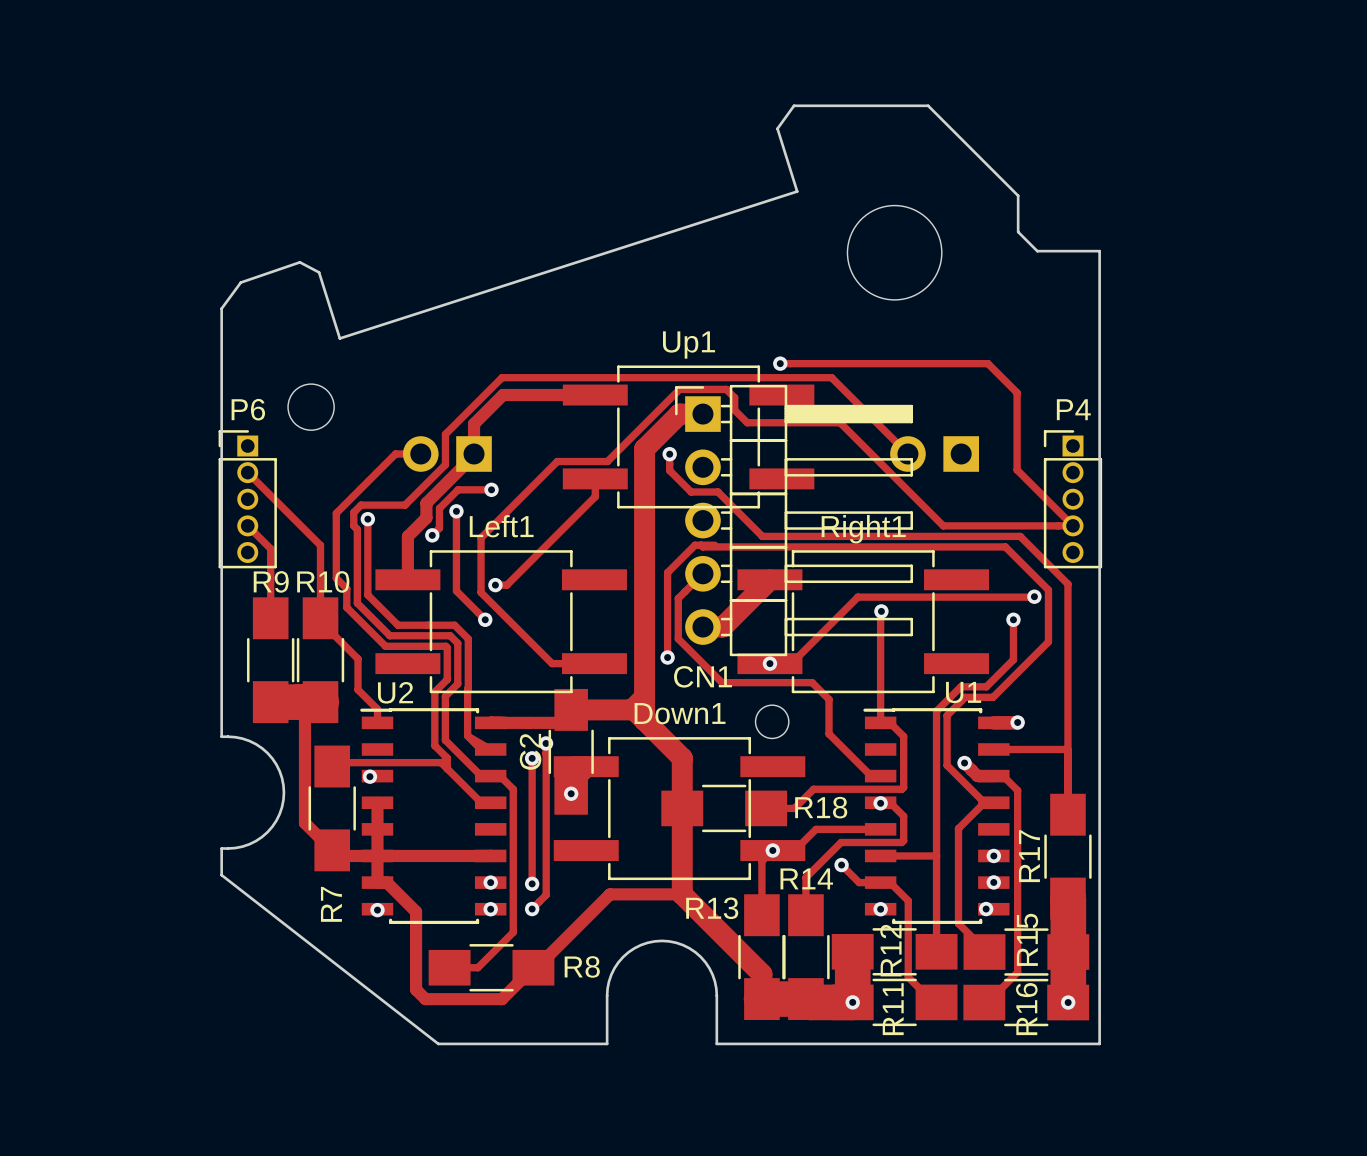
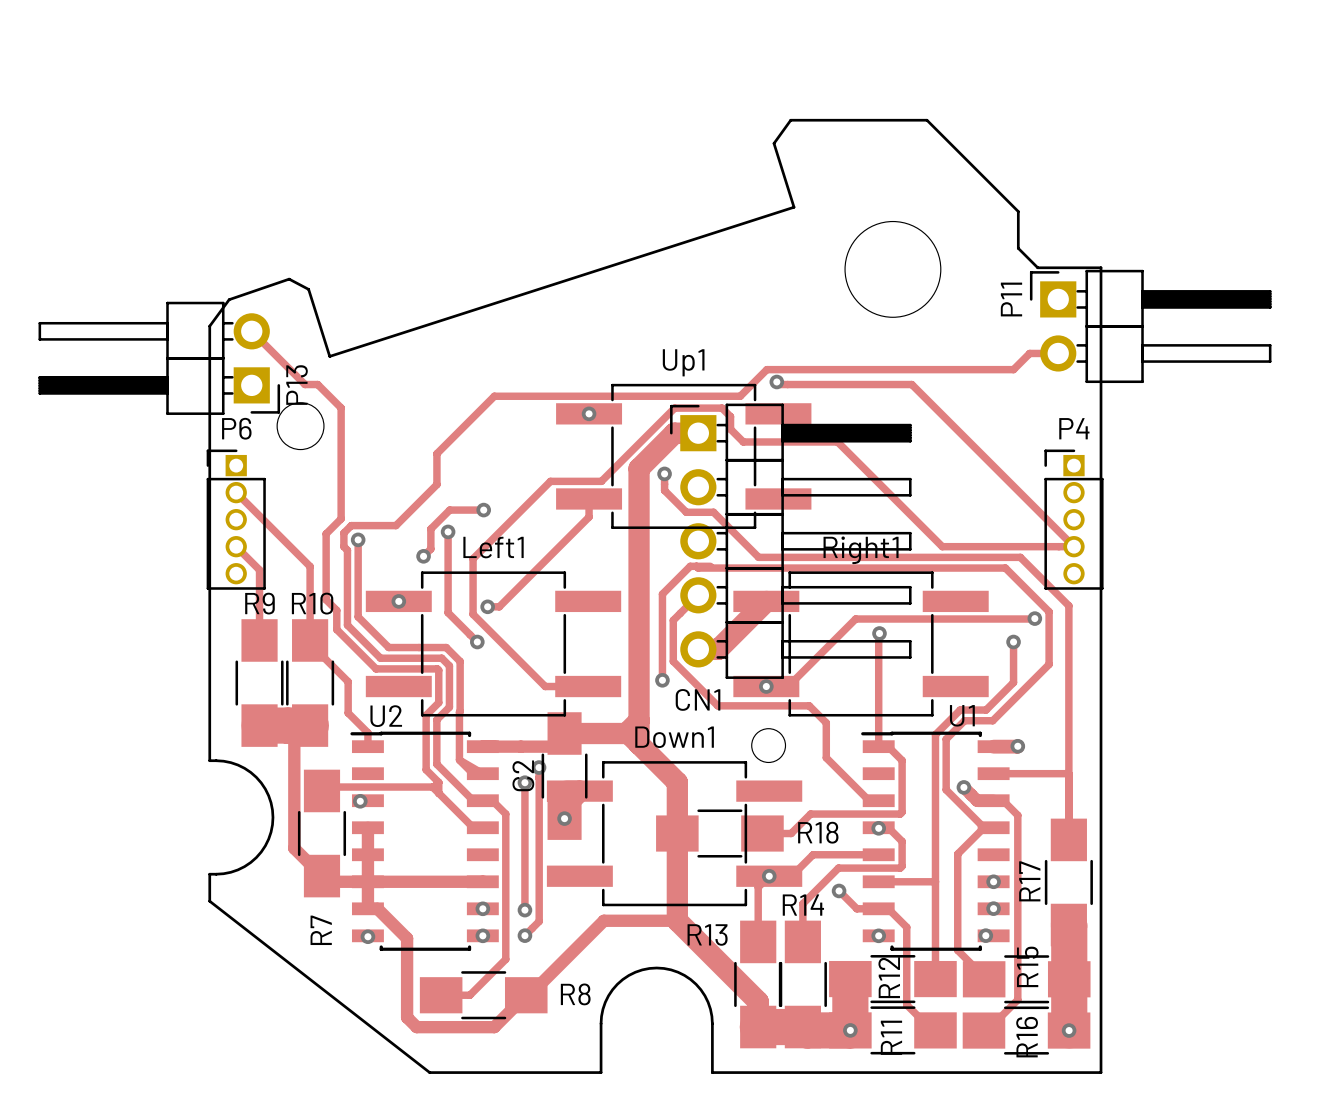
track: (780, 363) (987, 363) (1017, 392) (1017, 469) -> (777, 384) (911, 384) (1017, 489)
track: (744, 377) (831, 377) (907, 454) -> (740, 396) (766, 369) (1013, 369) (1029, 353) (1058, 353)
track: (595, 395) (503, 395) (474, 424) (474, 455) (426, 503) (426, 517) (407, 536) (407, 579) -> none
via: none -> (589, 413)
track: (420, 454) (395, 454) (351, 498) -> (251, 331) (304, 384) (317, 384) (341, 407) (341, 518)
P13 side: bottom (447, 454) -> top (159, 358)
P11 side: bottom (934, 454) -> top (1150, 326)
via: none -> (398, 601)

